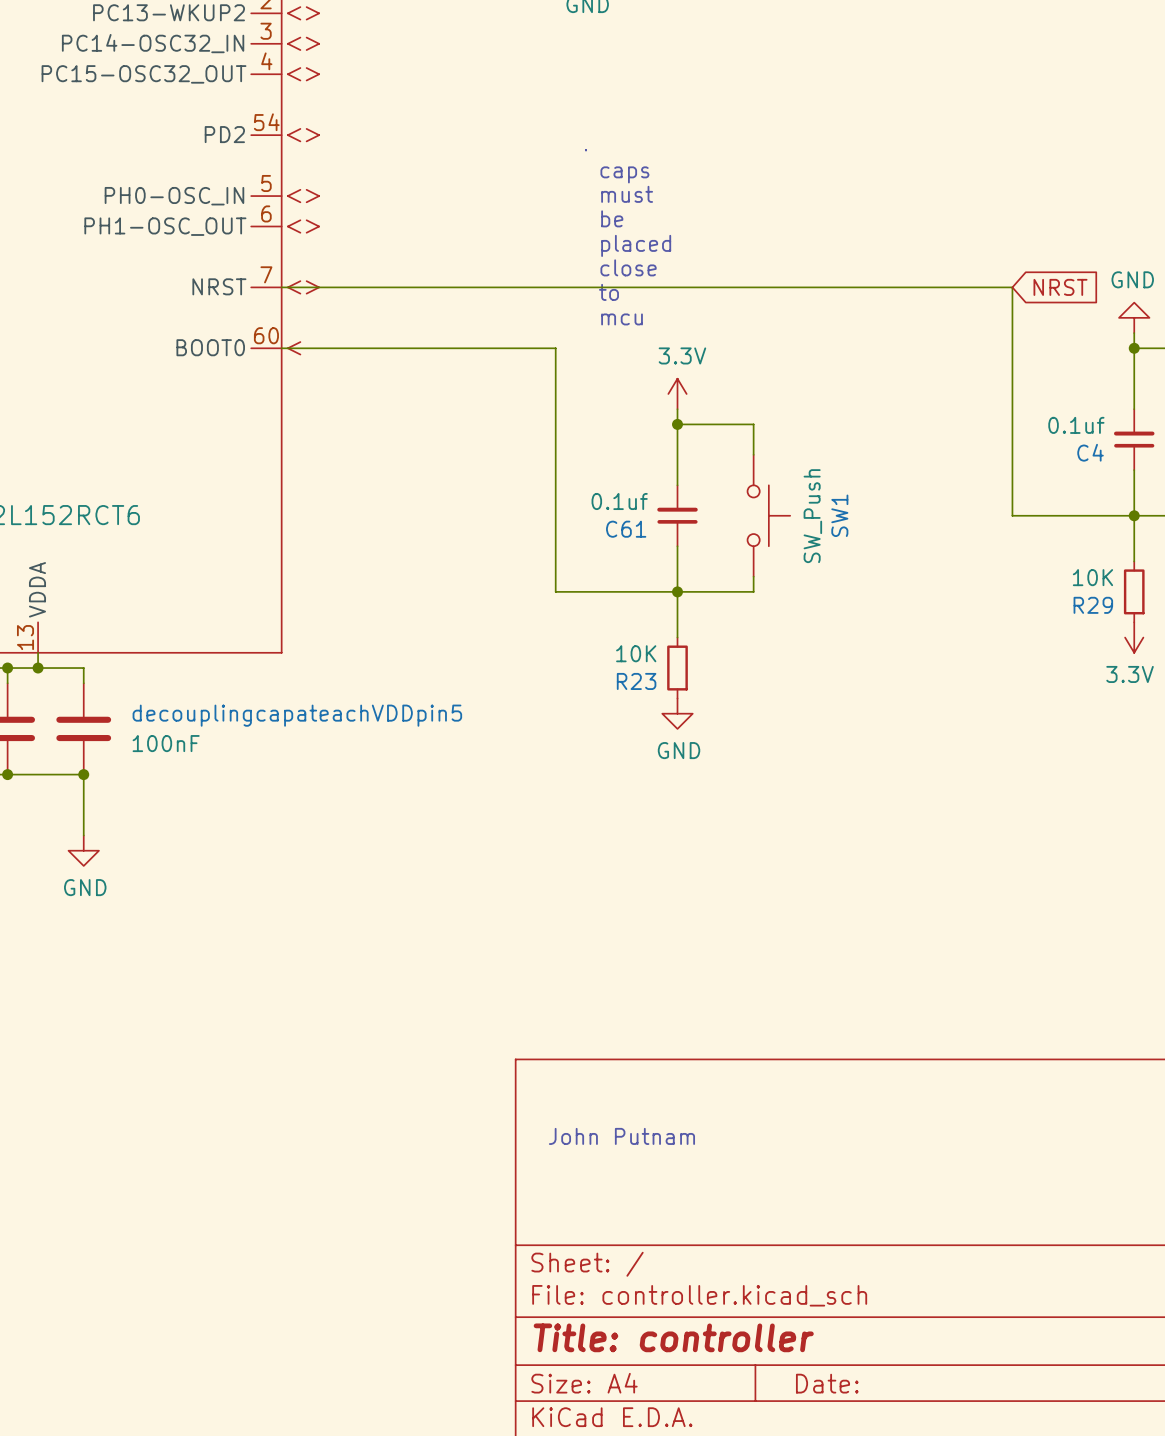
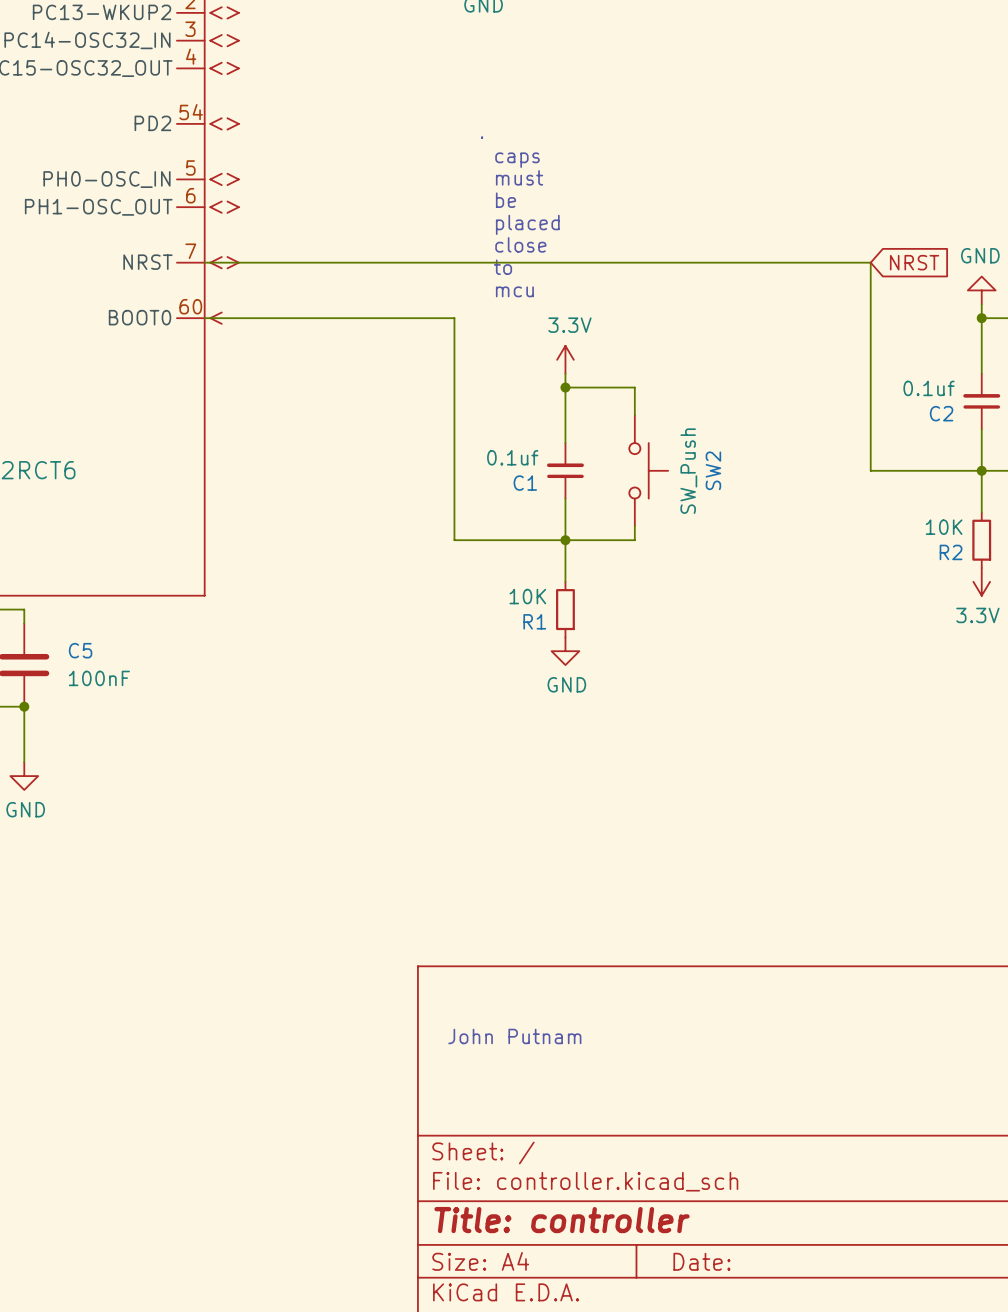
C4 name: C4 (1090, 452) -> C2 (941, 413)
SW1 name: SW1 (839, 515) -> SW2 (713, 470)
C61 name: C61 (626, 529) -> C1 (525, 483)
R29 name: R29 (1093, 605) -> R2 (951, 552)
R23 name: R23 (636, 681) -> R1 (534, 621)
decouplingcapateachVDDpin5 name: decouplingcapateachVDDpin5 (297, 715) -> C5 (80, 650)

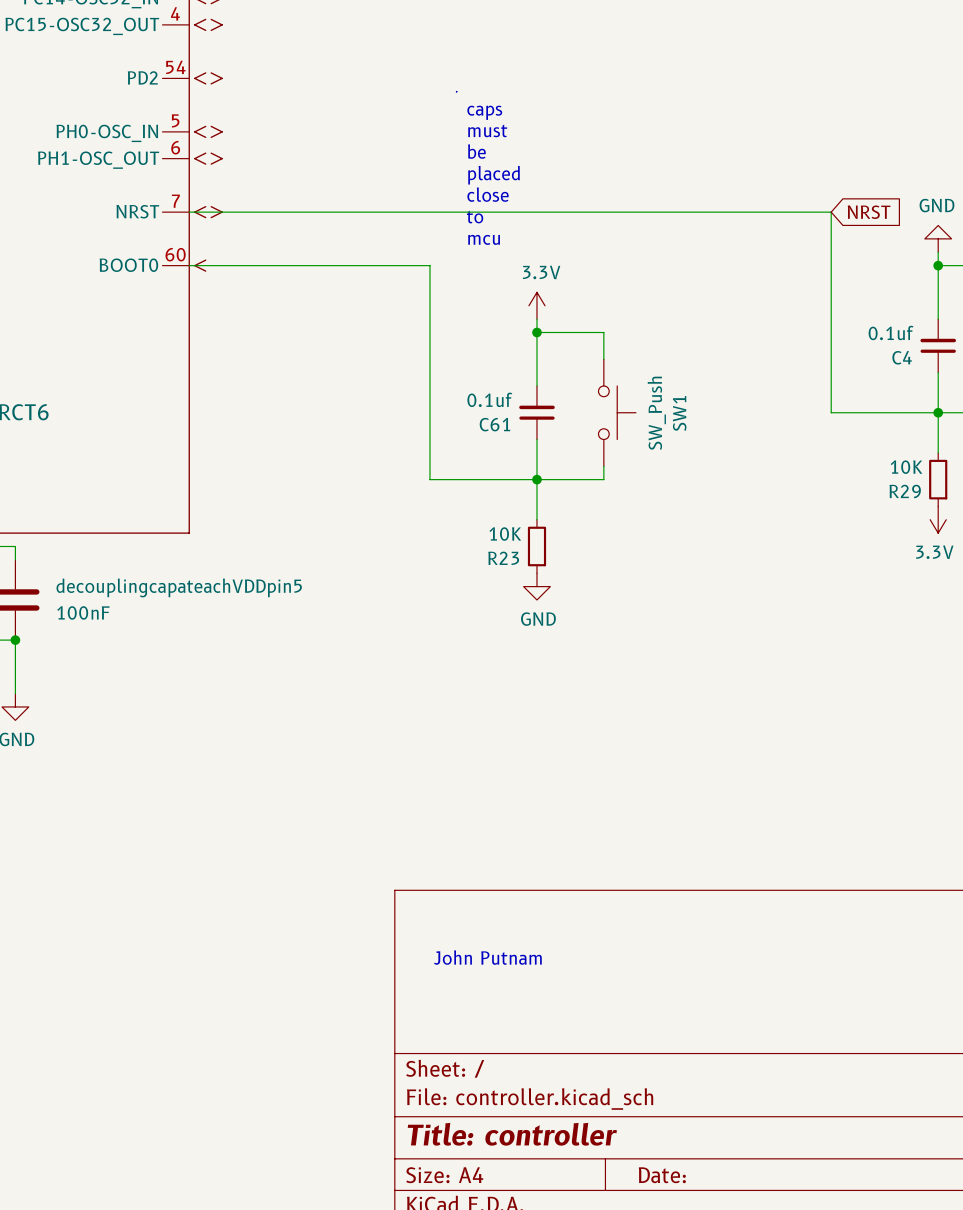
C2 name: C2 (941, 413) -> C4 (902, 357)
SW2 name: SW2 (713, 470) -> SW1 (679, 413)
C1 name: C1 (525, 483) -> C61 (494, 424)
R2 name: R2 (951, 552) -> R29 (905, 491)
R1 name: R1 (534, 621) -> R23 (503, 558)
C5 name: C5 (80, 650) -> decouplingcapateachVDDpin5 (179, 587)

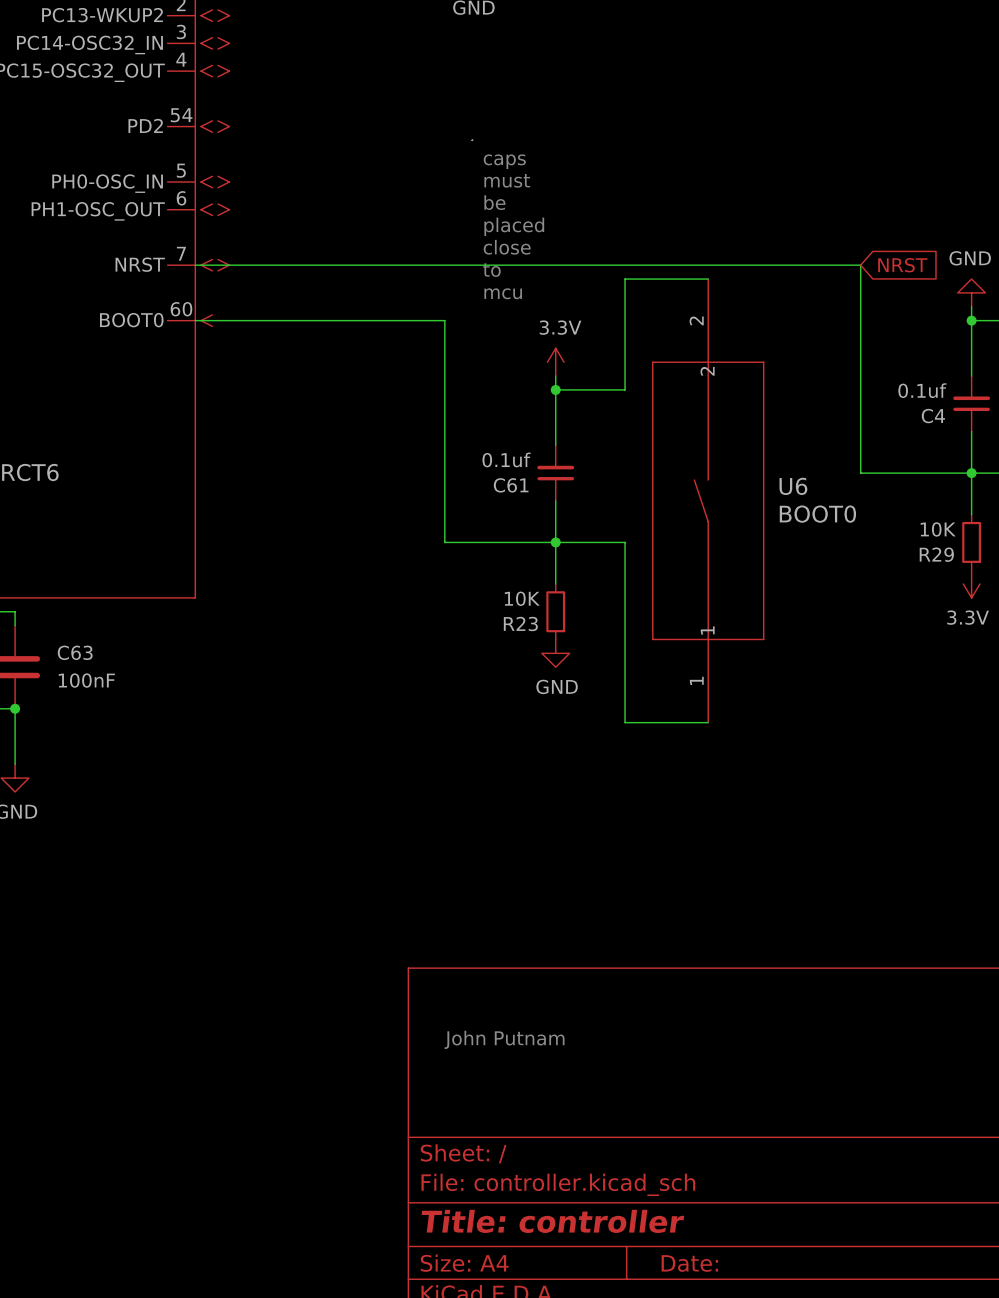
wire: (603, 332) (603, 359) -> (625, 389) (625, 279) (708, 279)
SW1: SW_Push (617, 412) -> none
U6: none -> BOOT0 (708, 500)
wire: (603, 466) (603, 479) -> (708, 722) (625, 722) (625, 542)
decouplingcapateachVDDpin5 name: decouplingcapateachVDDpin5 (179, 587) -> C63 (75, 652)

